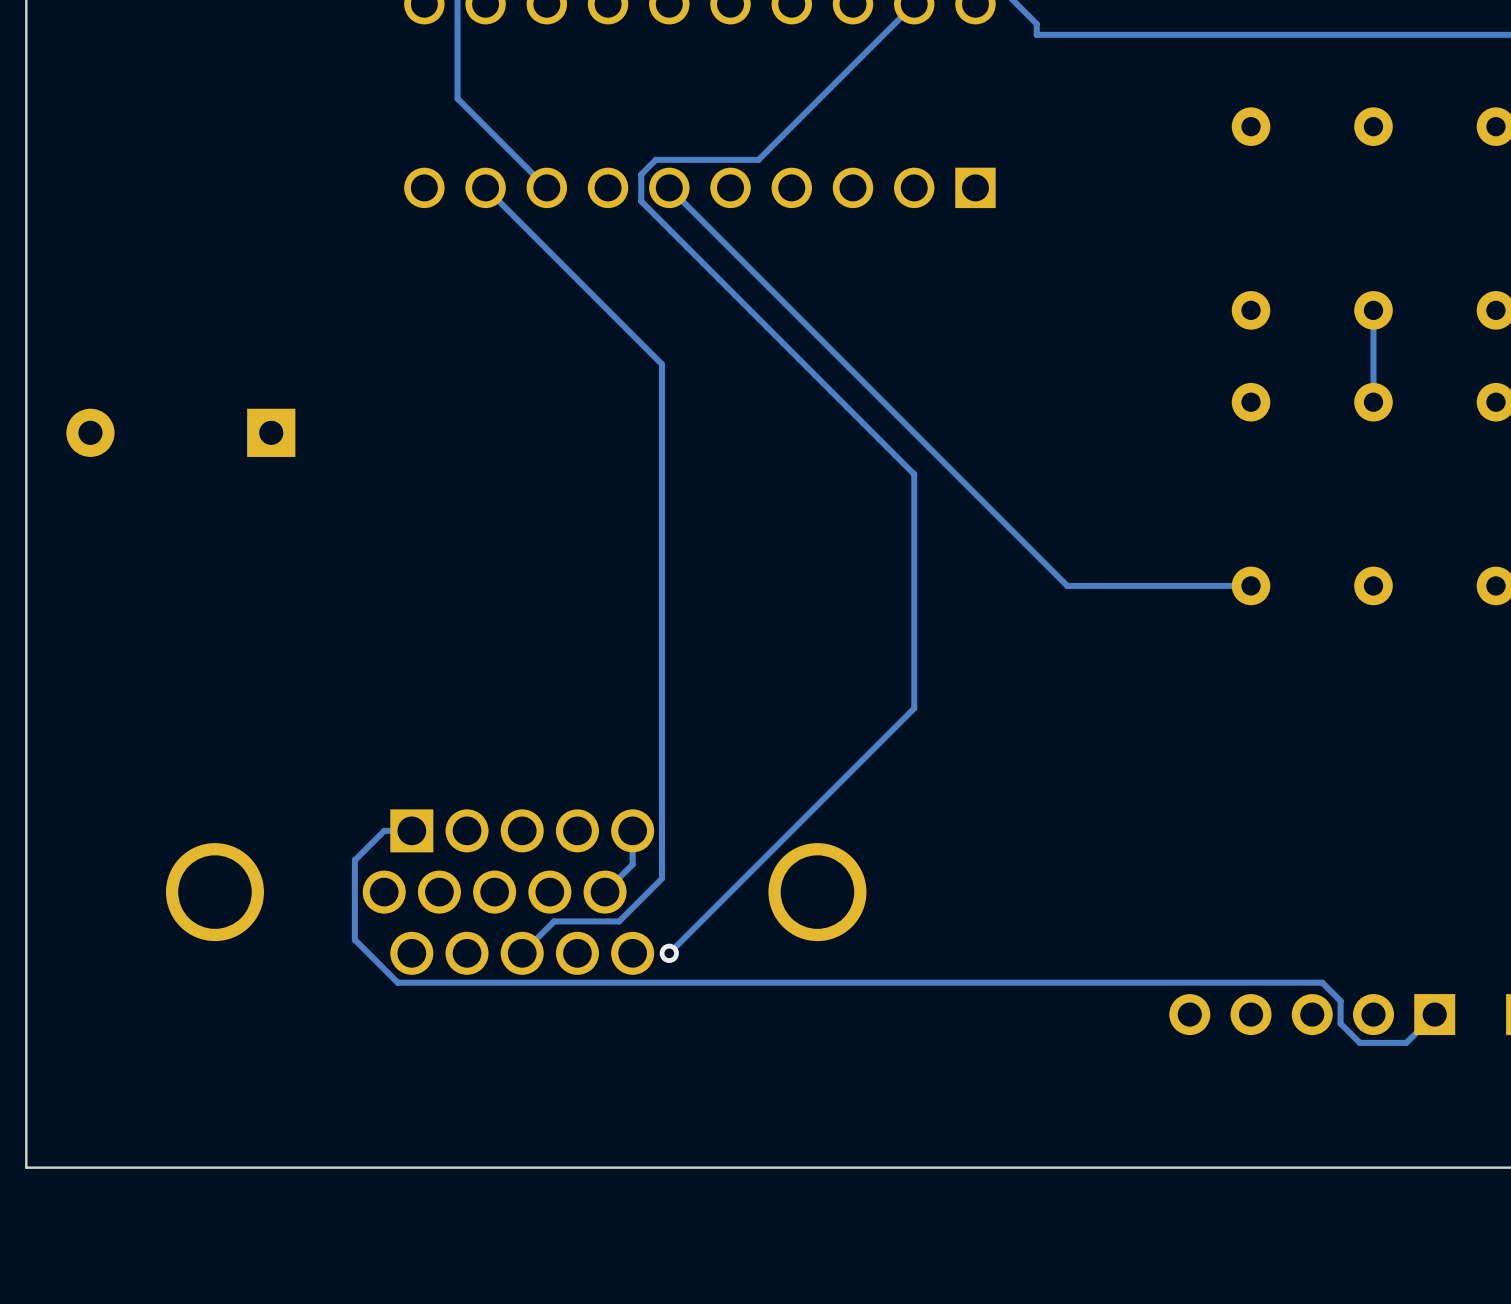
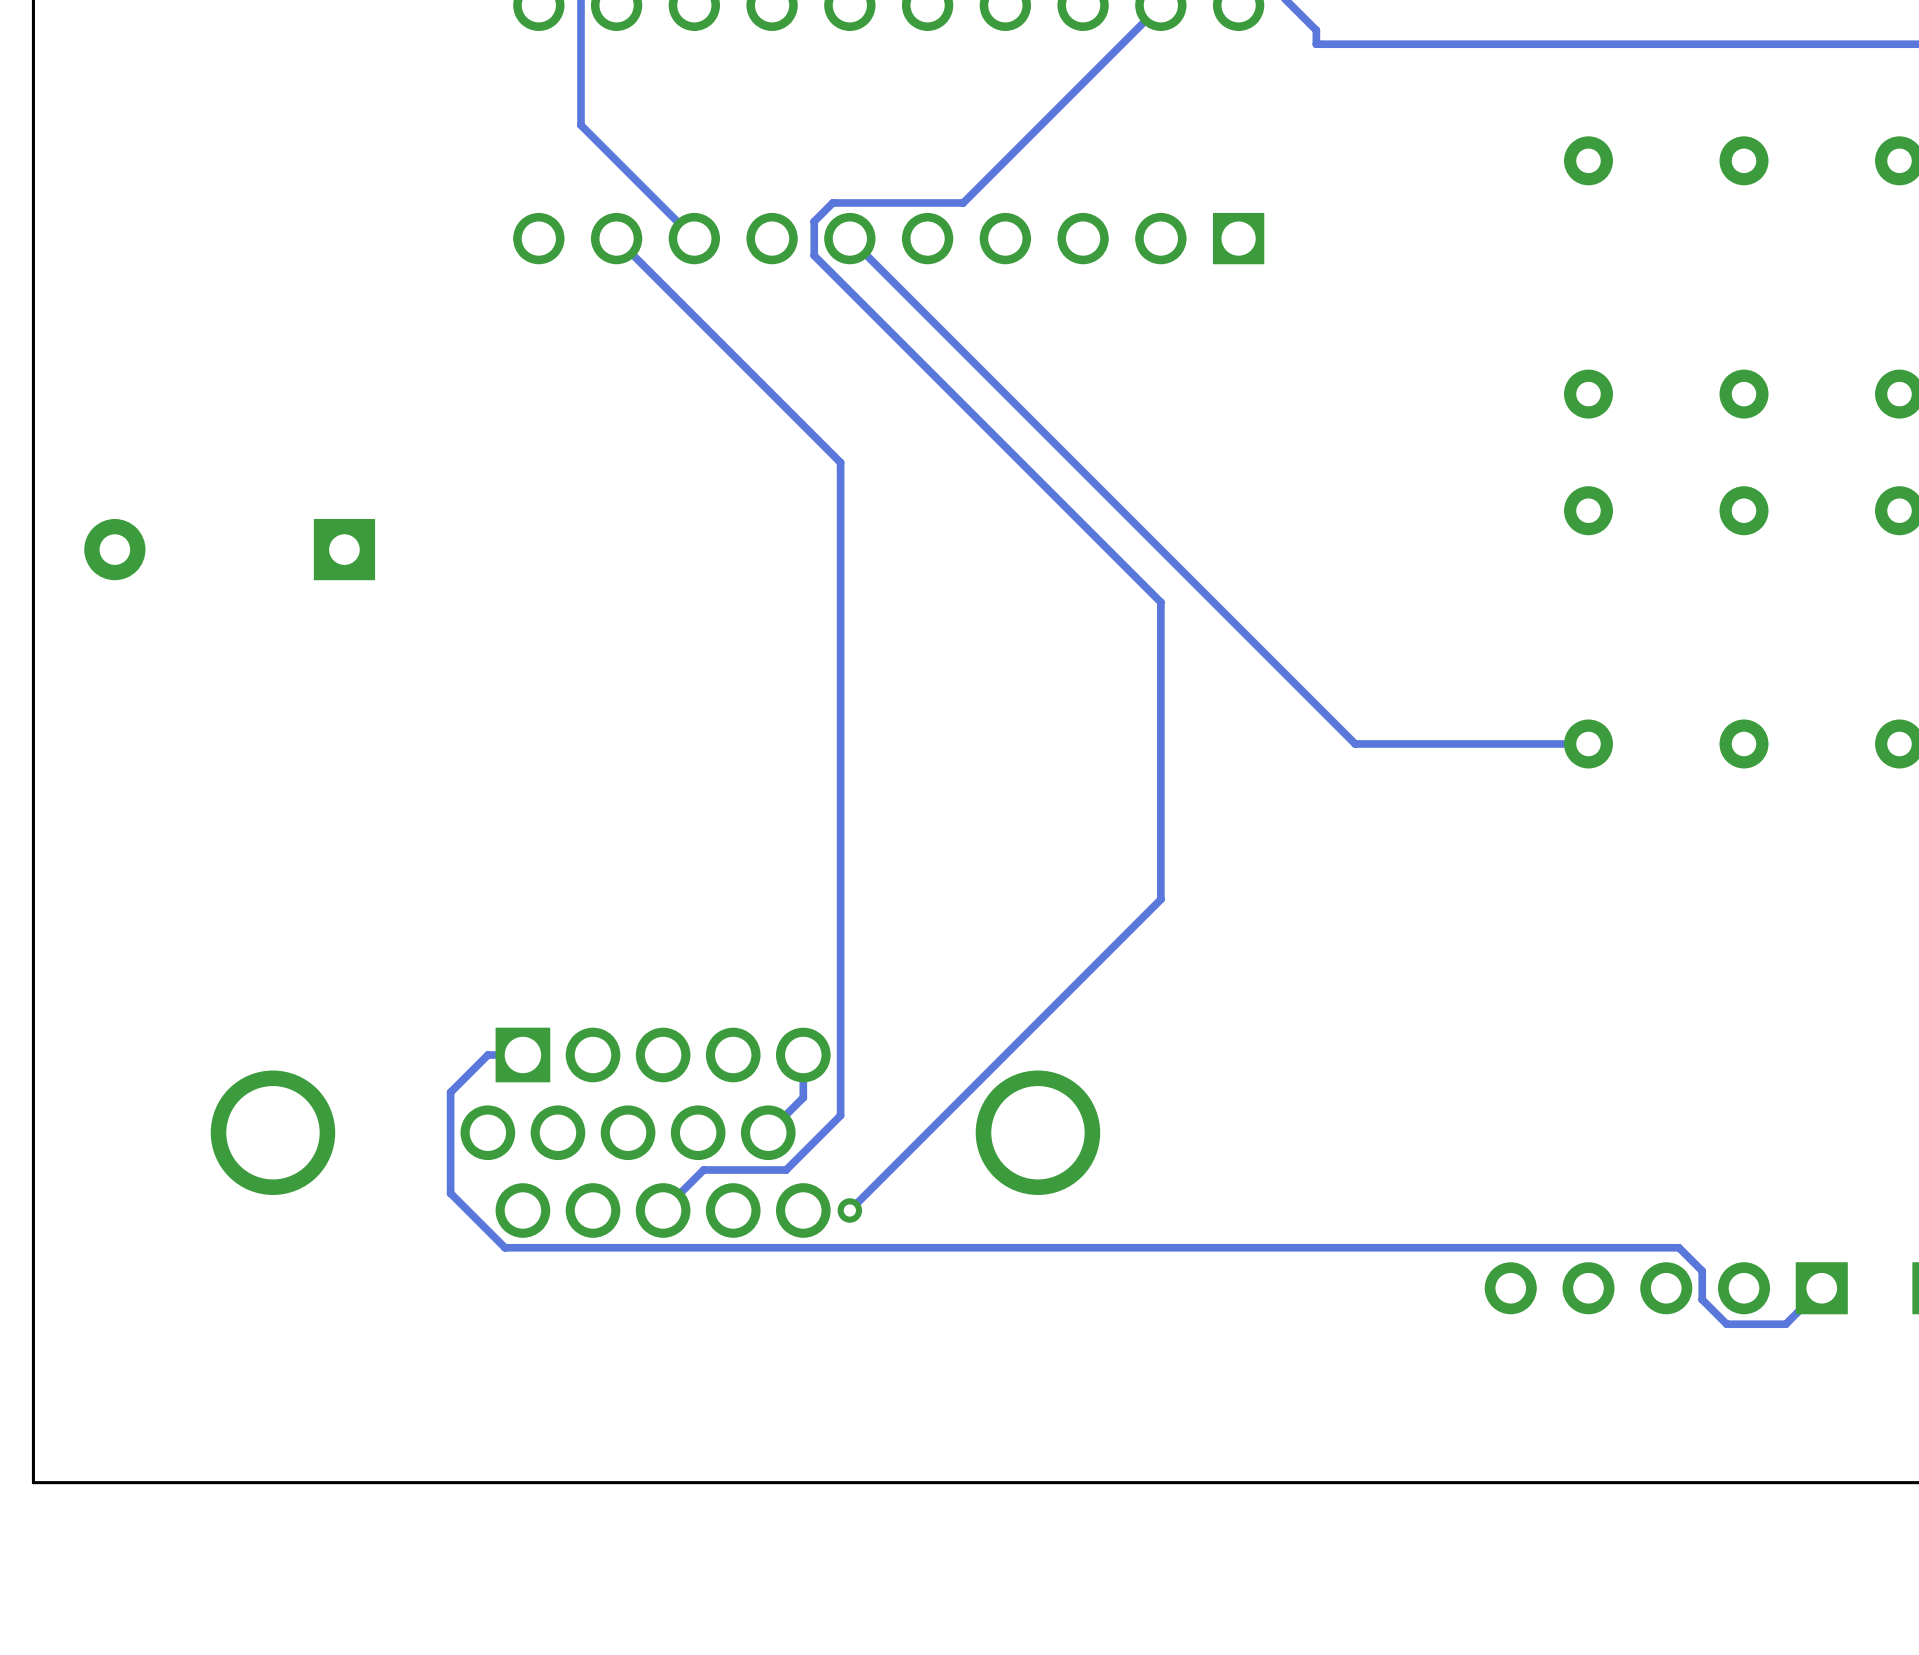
track: (1373, 310) (1373, 402) -> none

